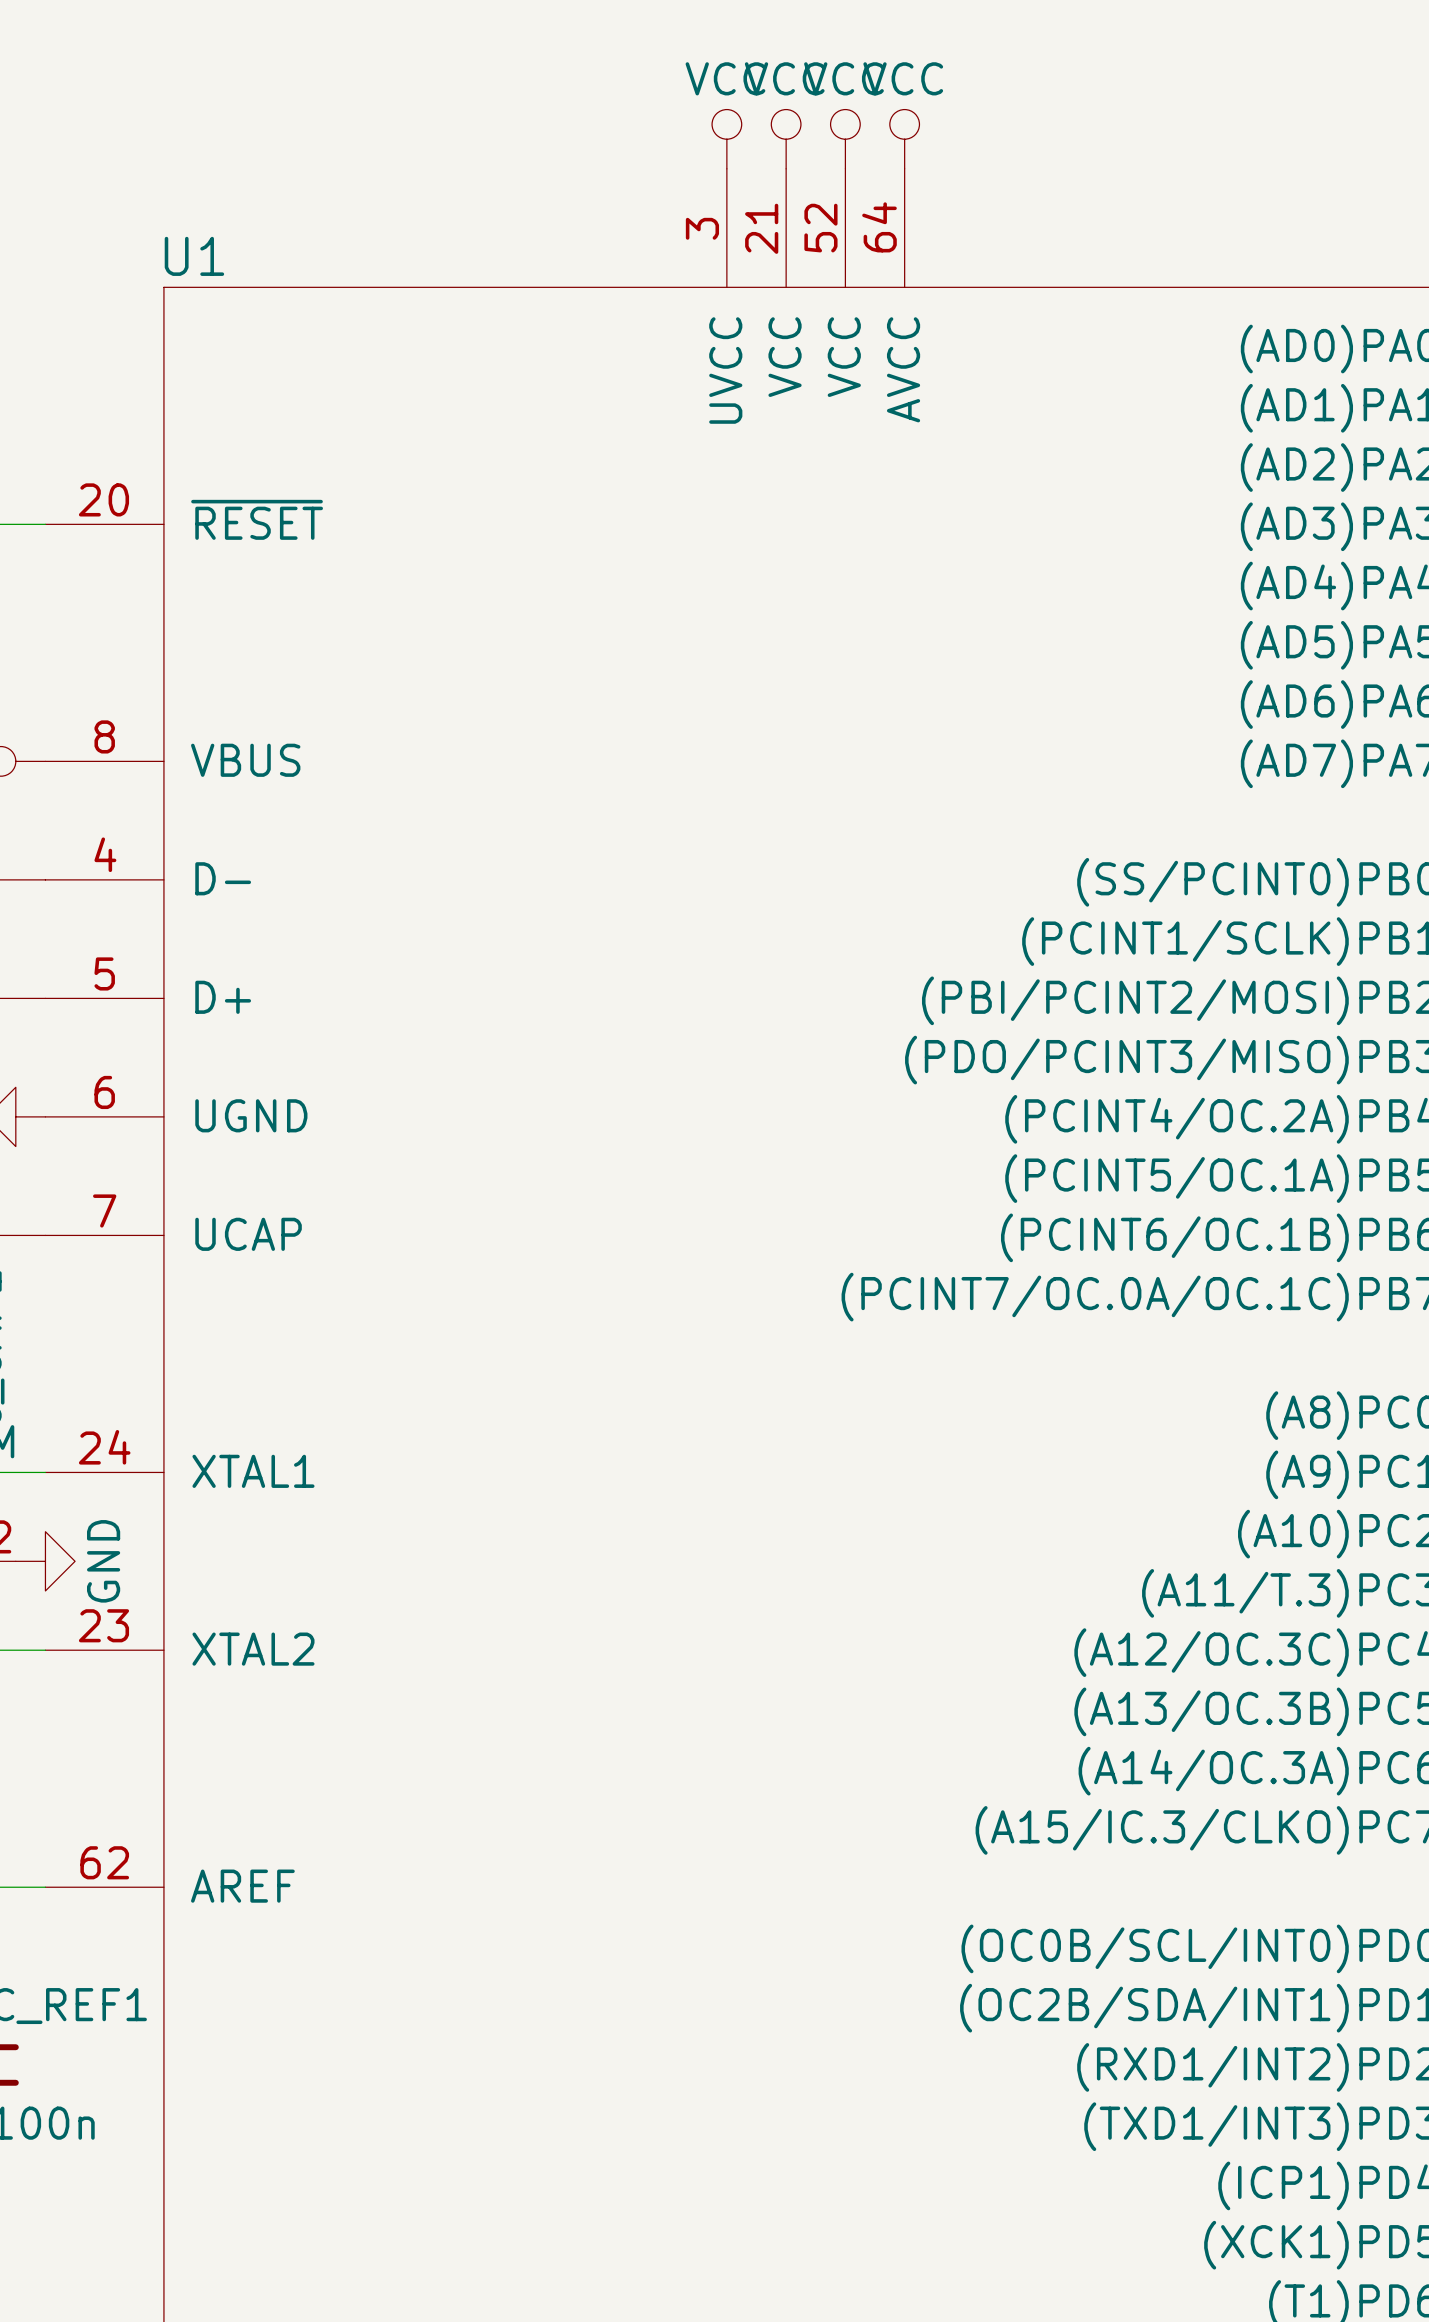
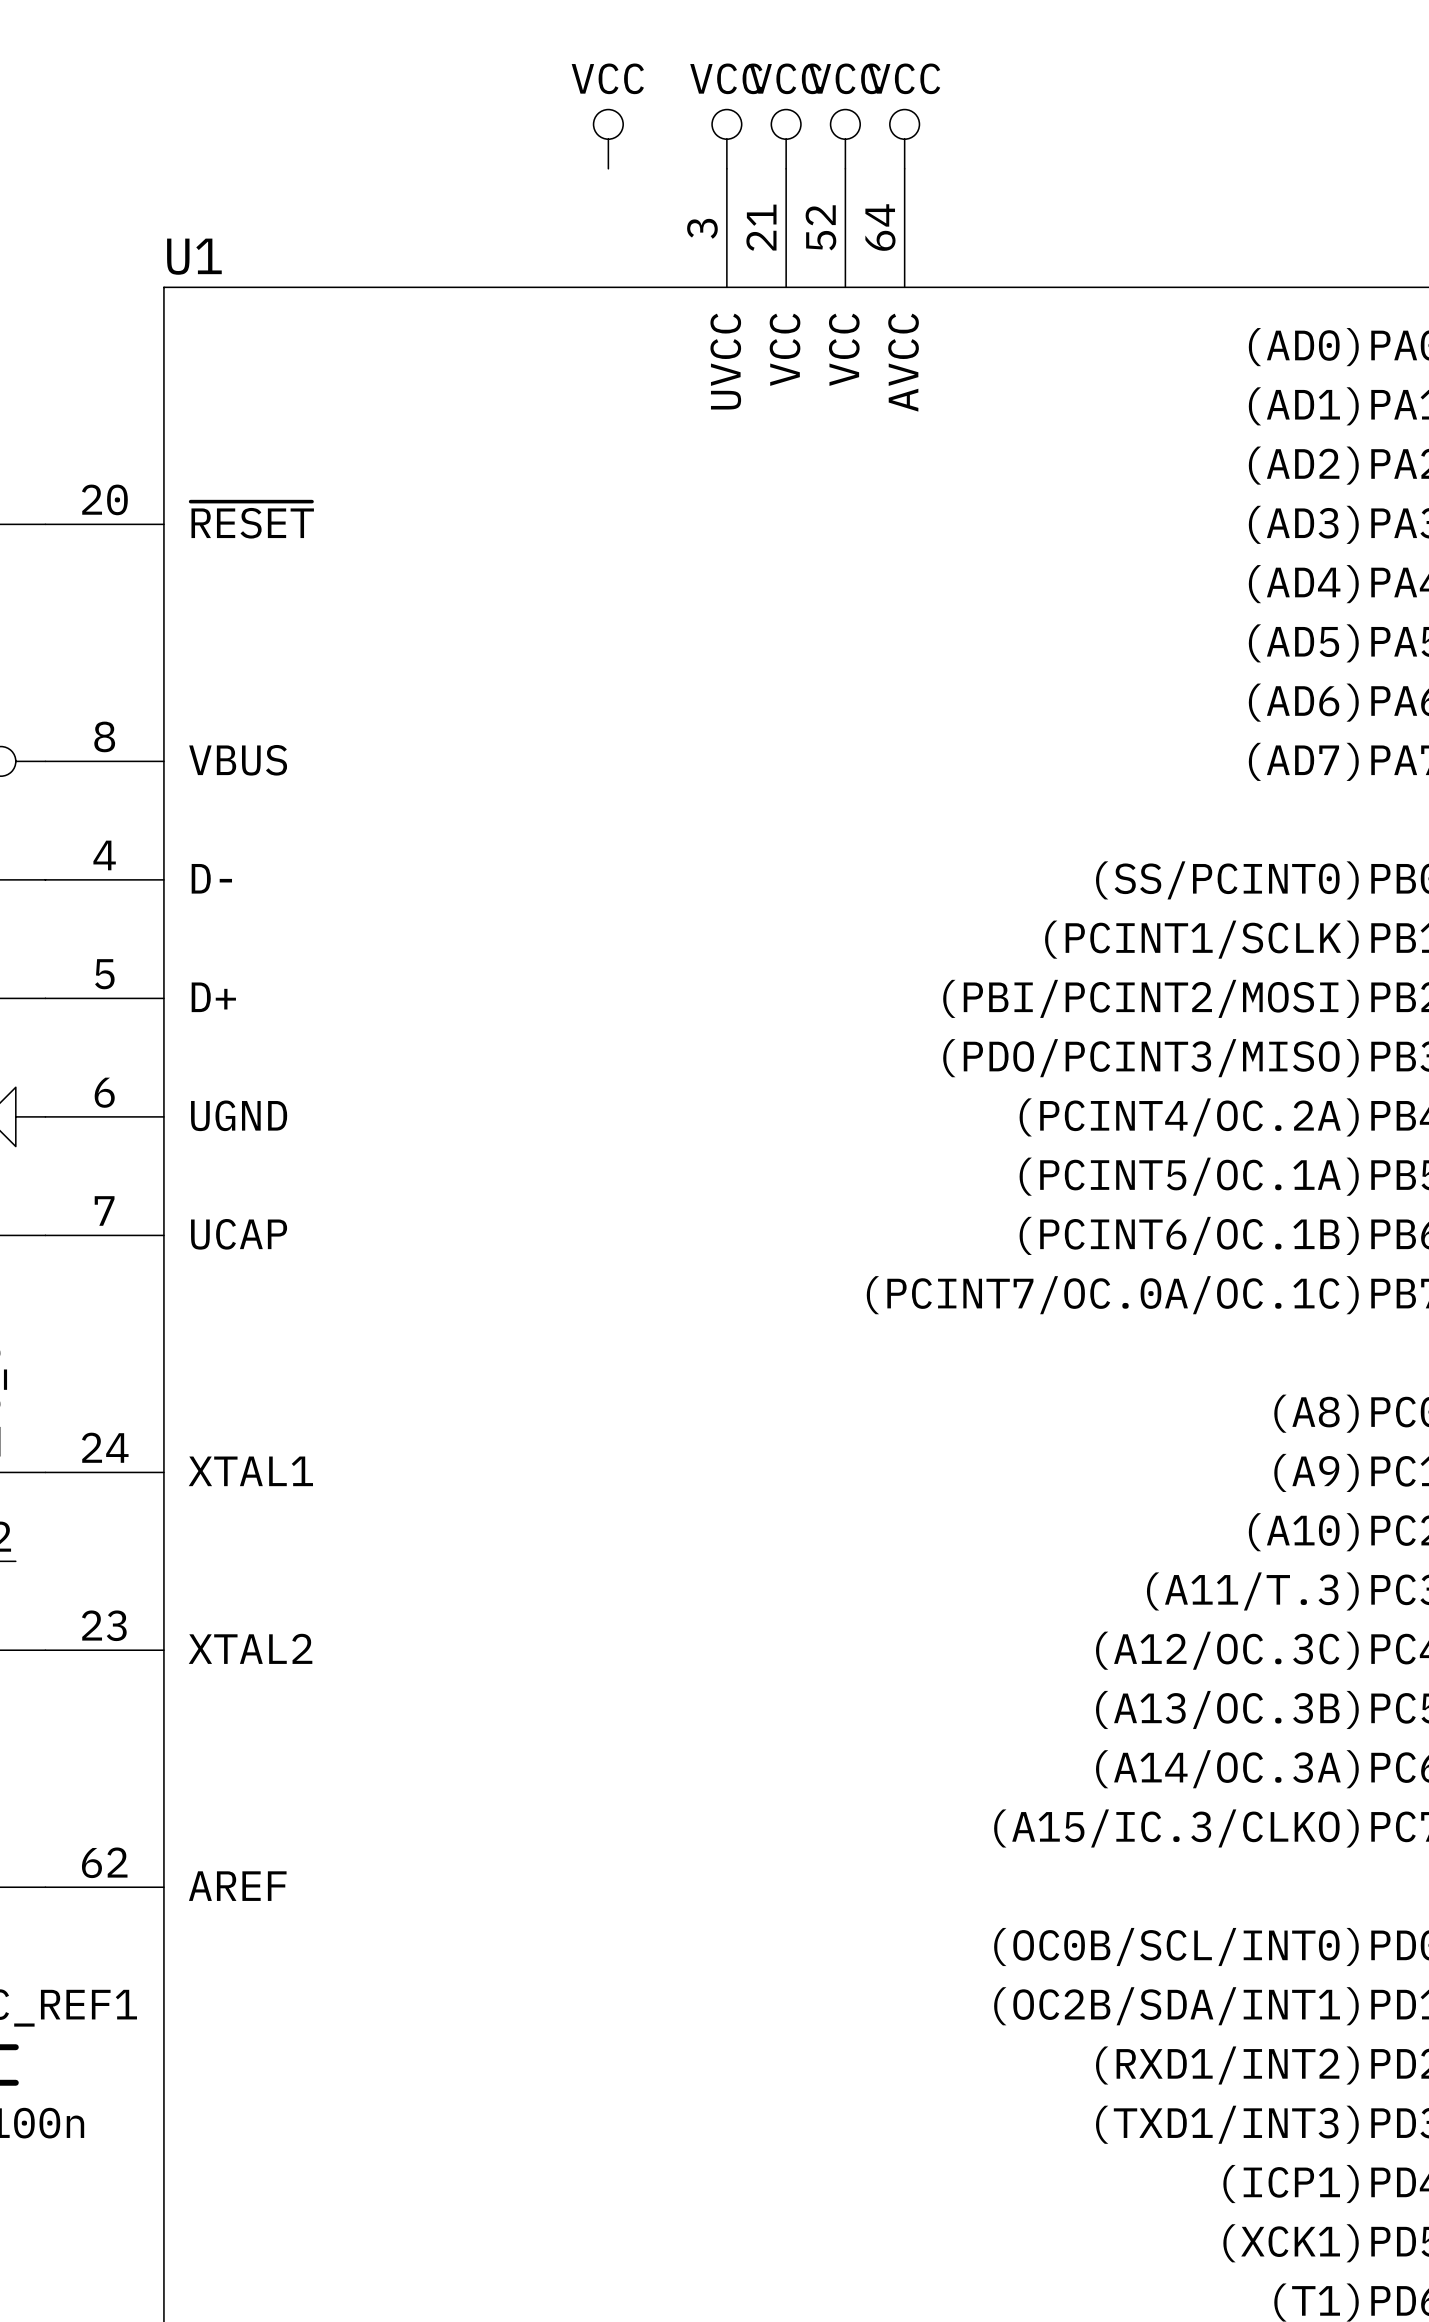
power symbol: none -> VCC (608, 139)
power symbol: GND (45, 1561) -> none

